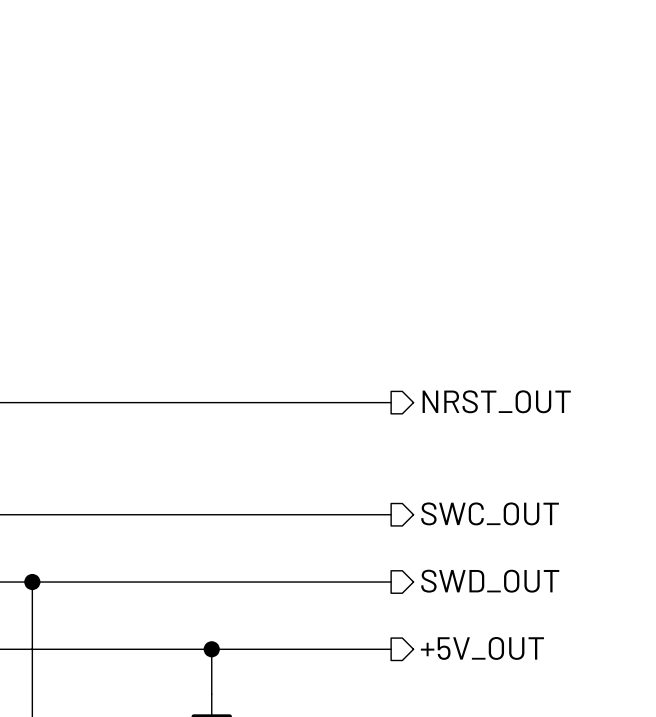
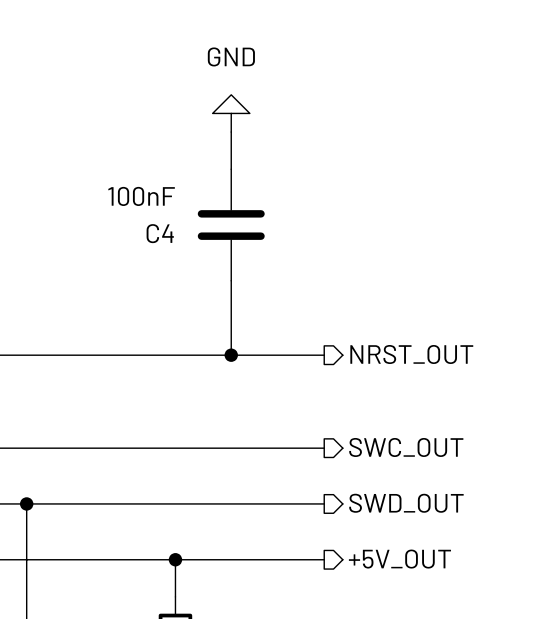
power symbol: none -> GND (231, 113)
wire: none -> (231, 132) (231, 169)
C4: none -> 100nF (231, 225)
wire: none -> (231, 280) (231, 355)
junction: none -> (231, 355)

